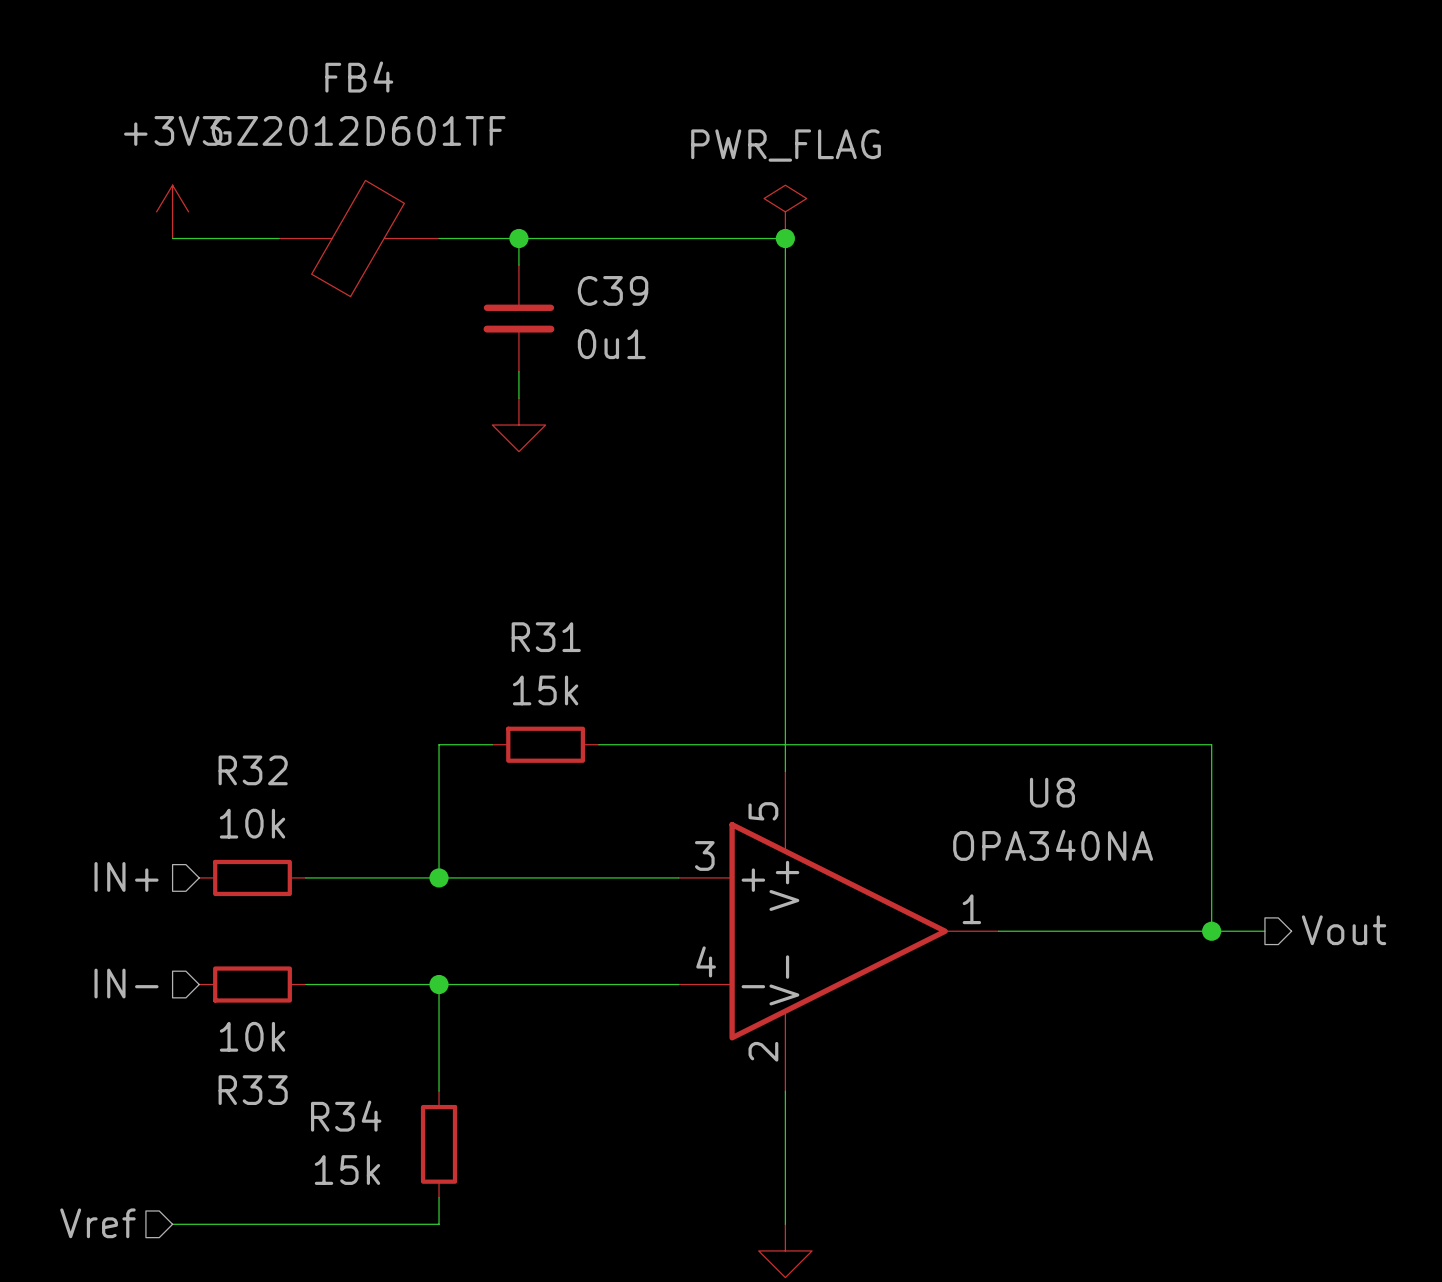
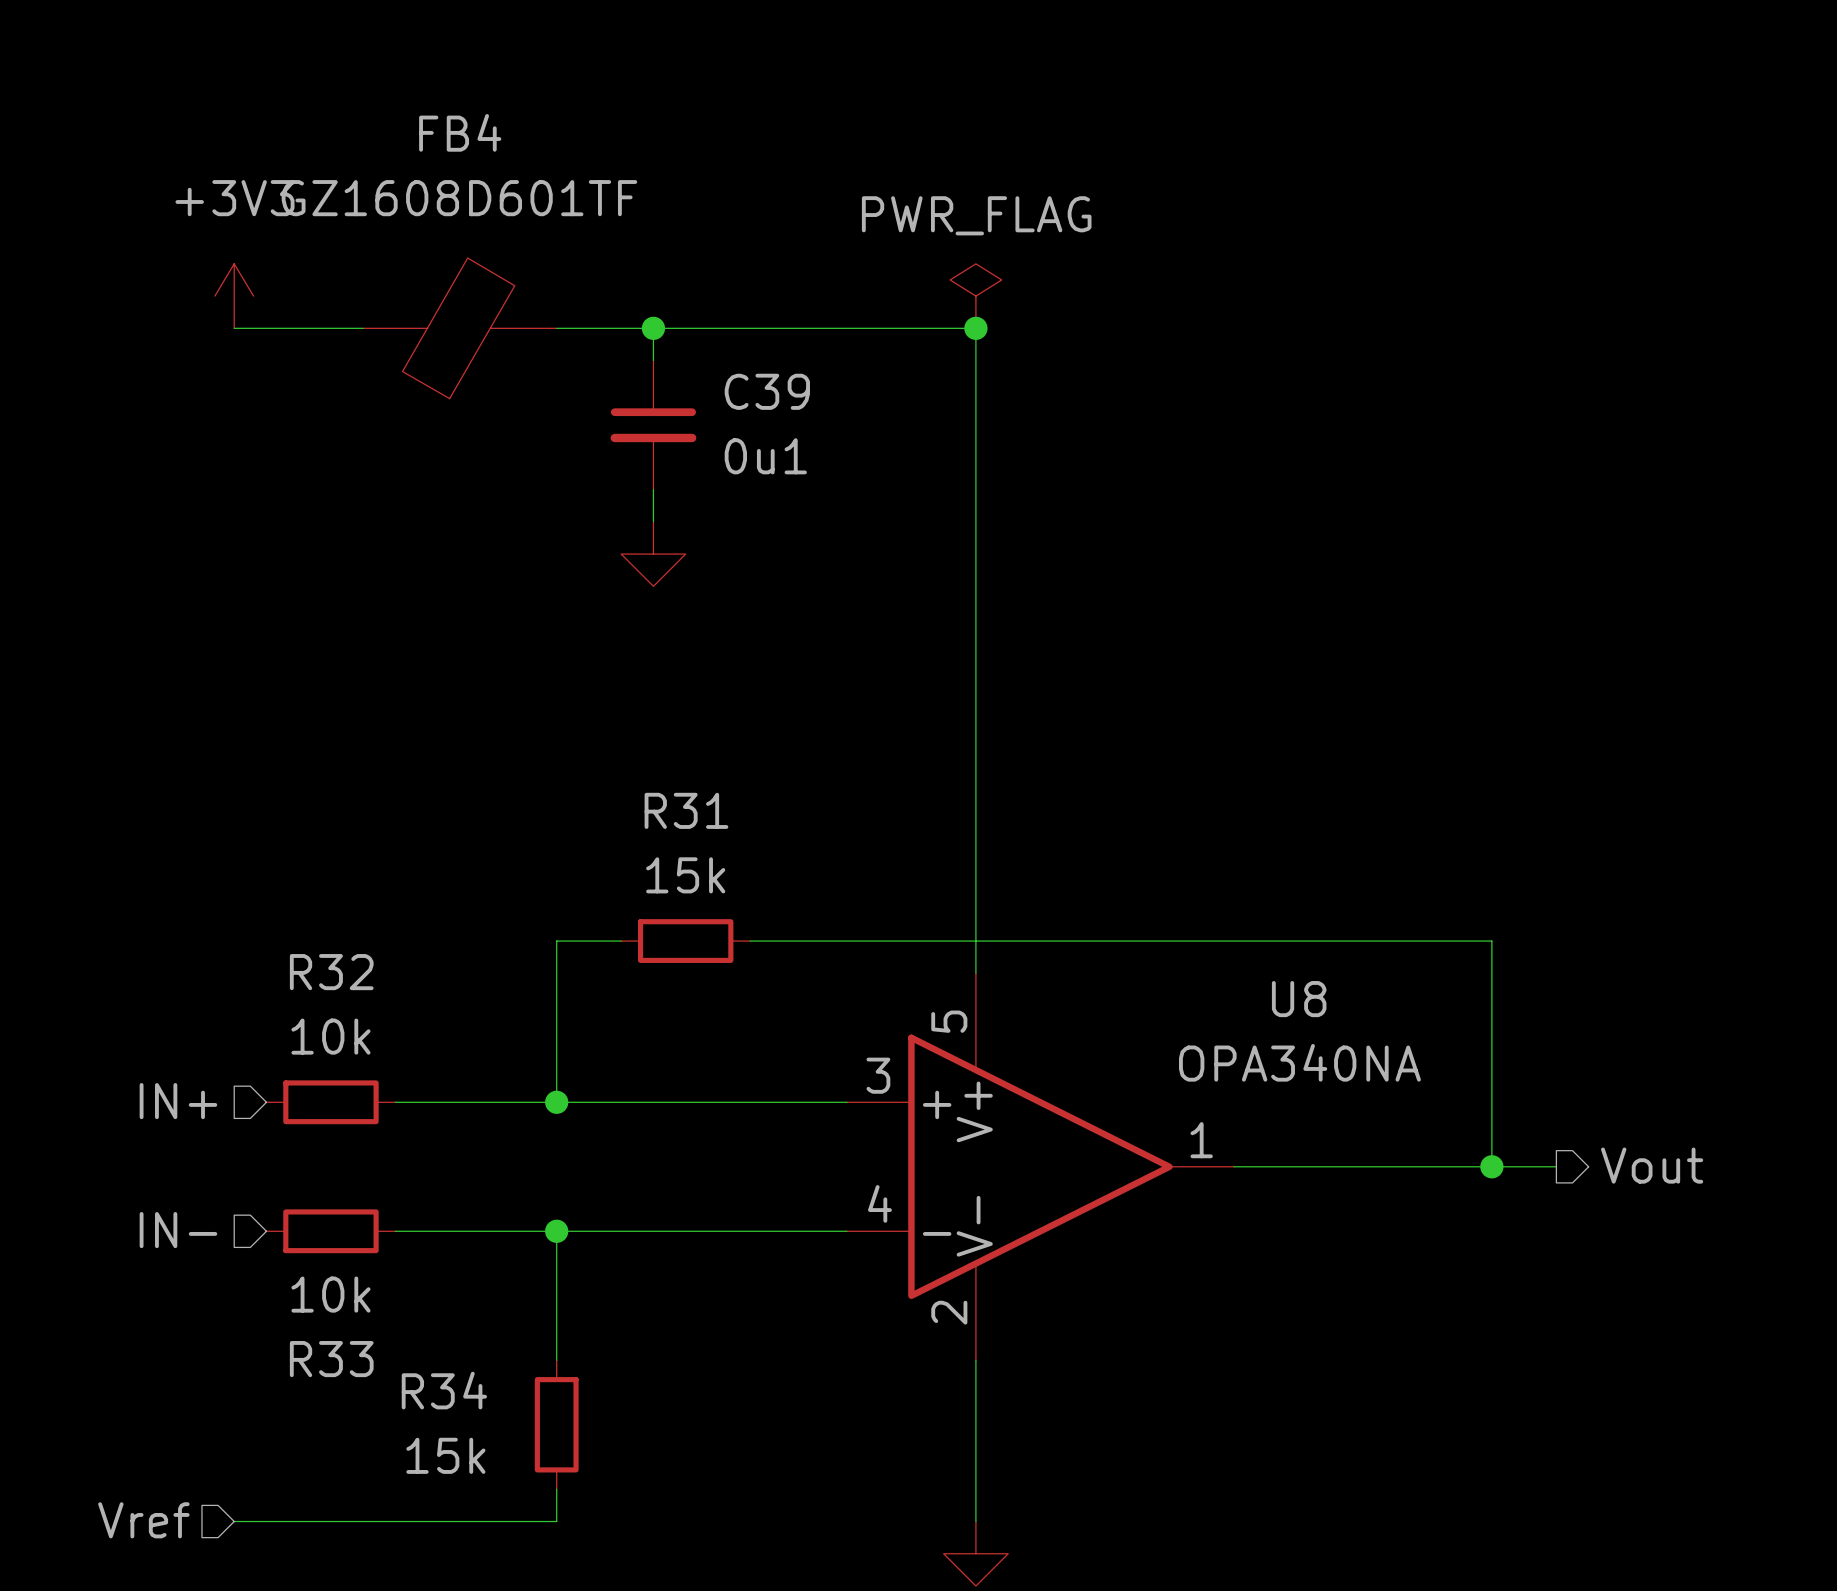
FB4 value: GZ2012D601TF (358, 130) -> GZ1608D601TF (459, 198)

